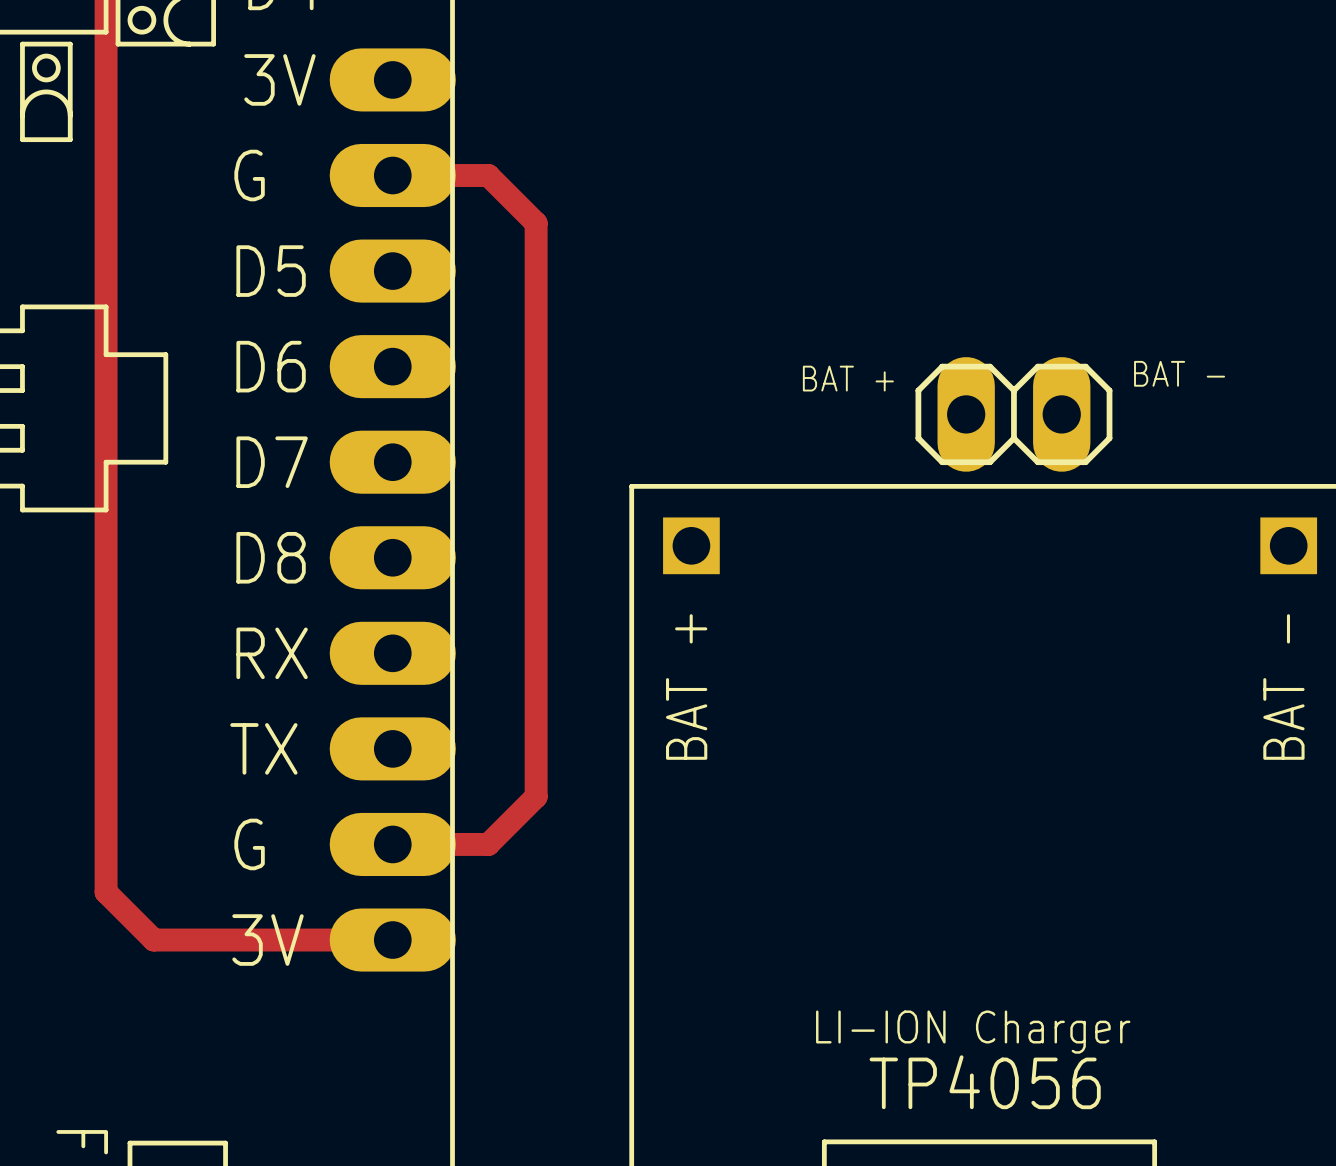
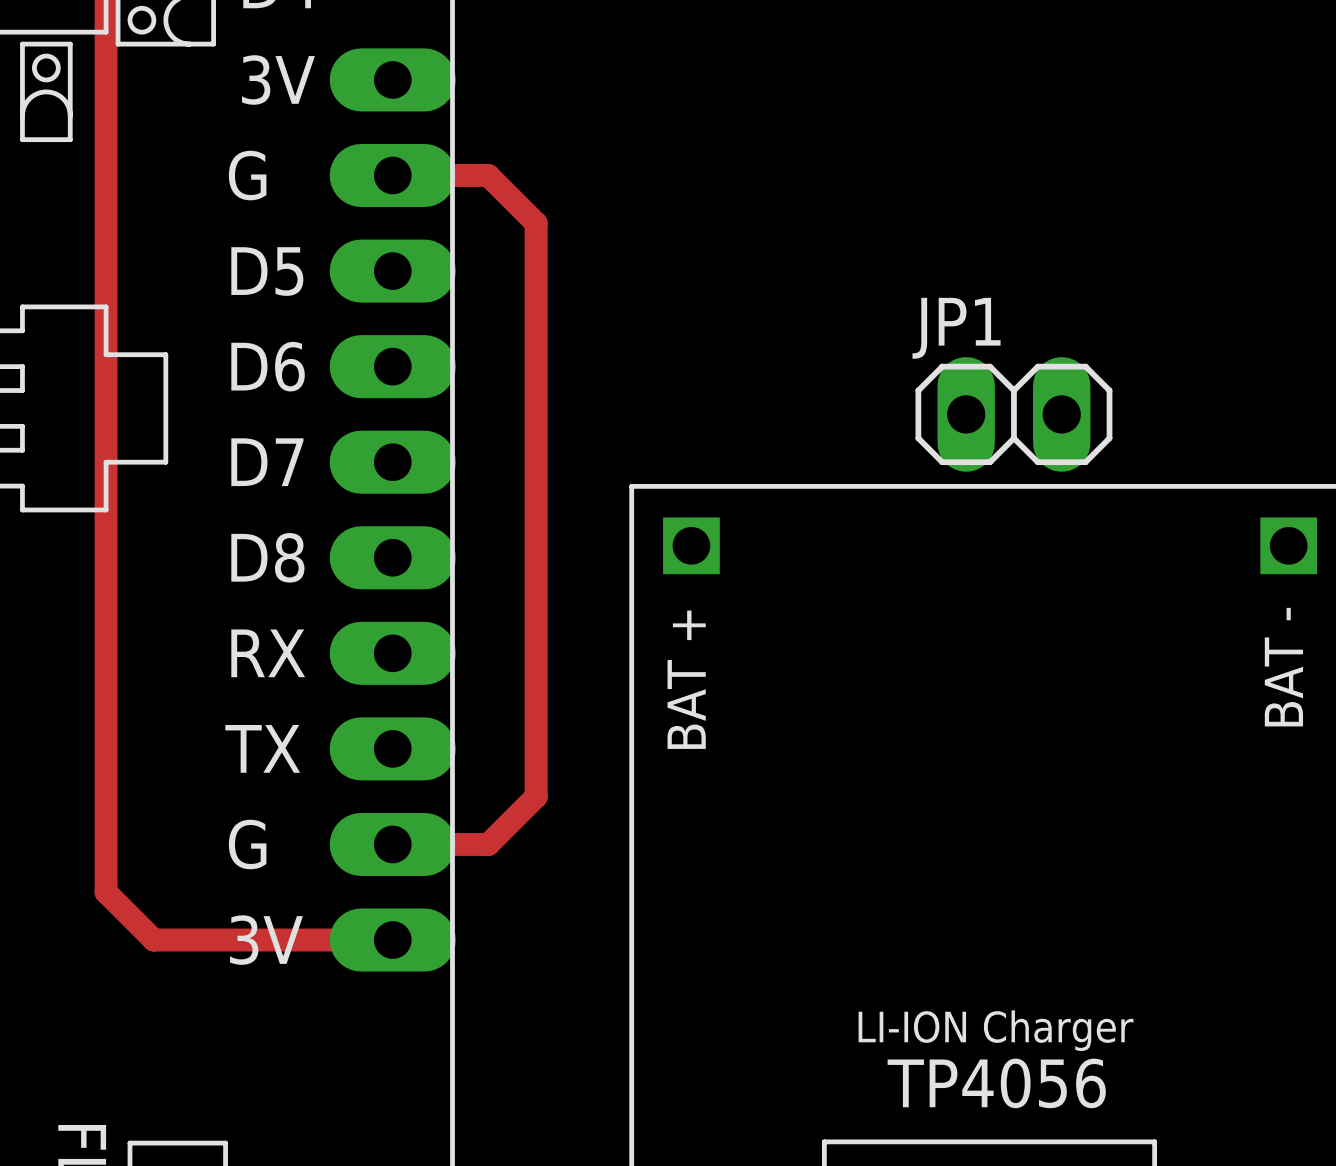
JP1 name: none -> JP1 (956, 328)
text: BAT - (1179, 373) -> none
text: BAT + (848, 378) -> none

